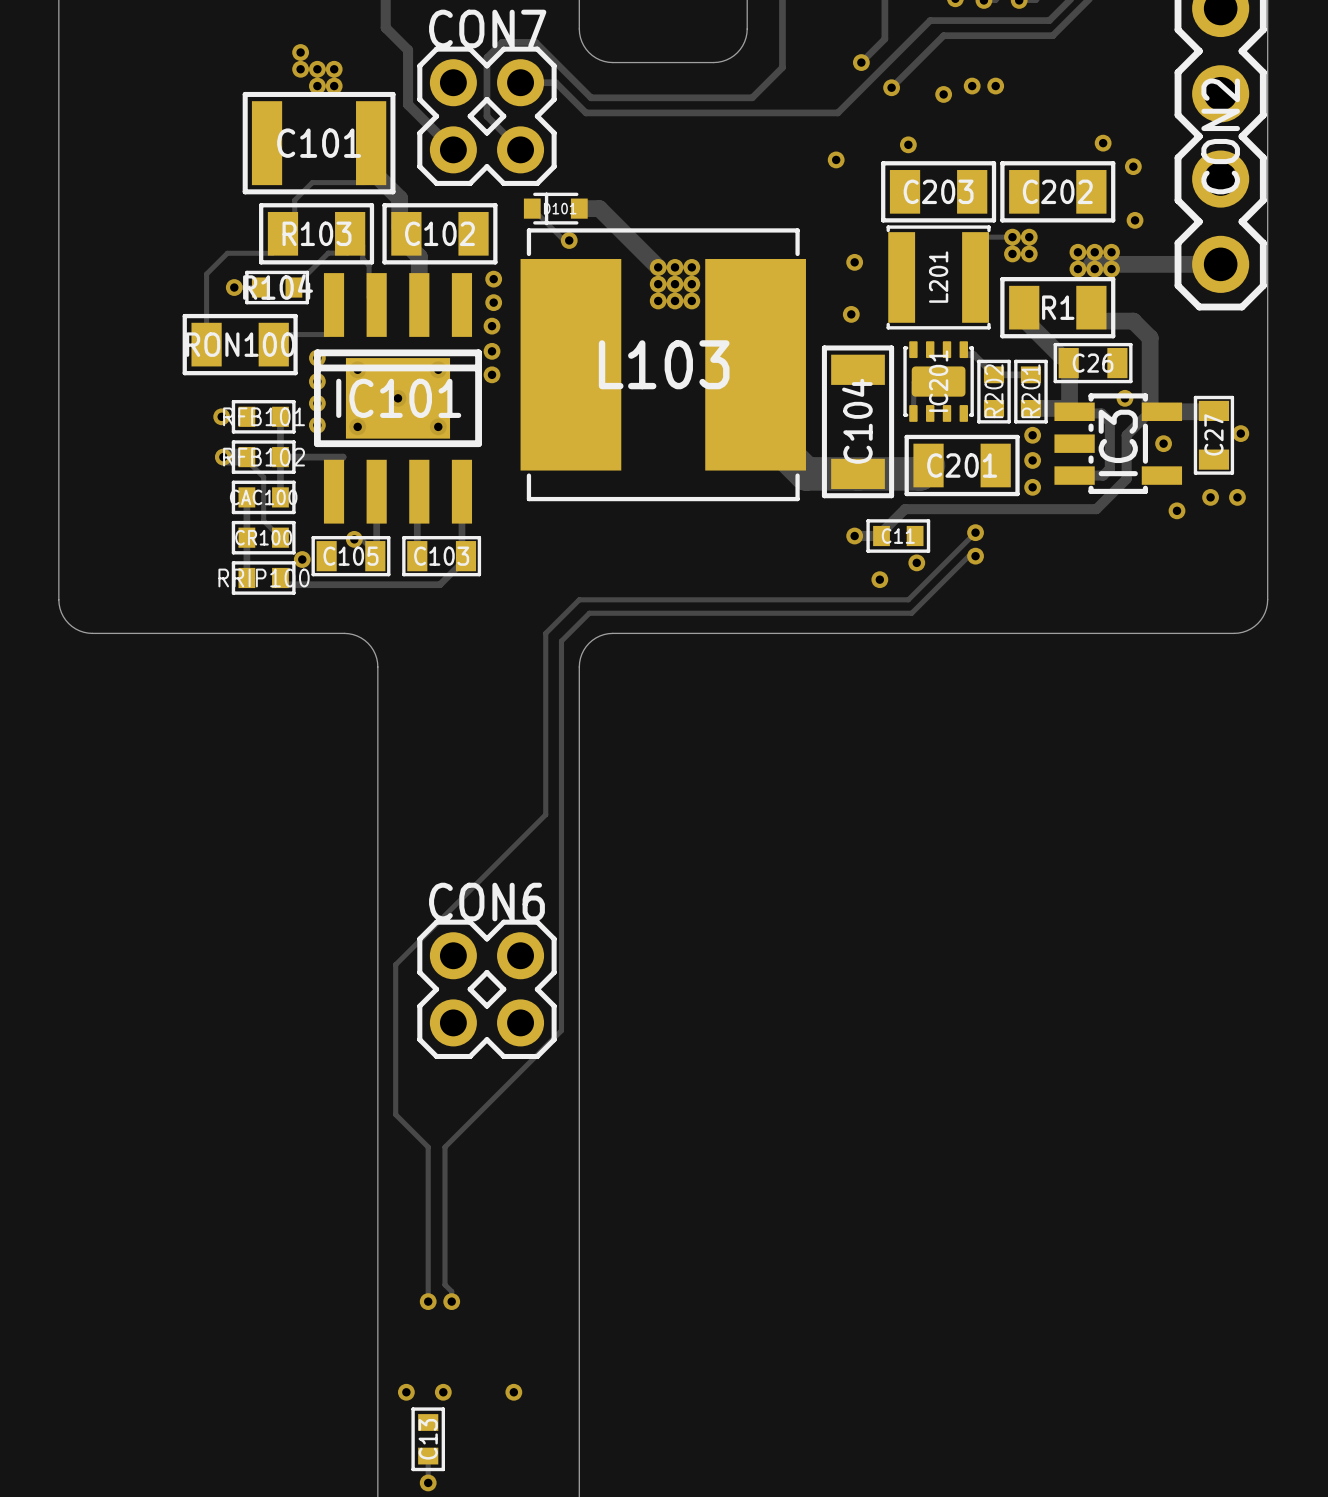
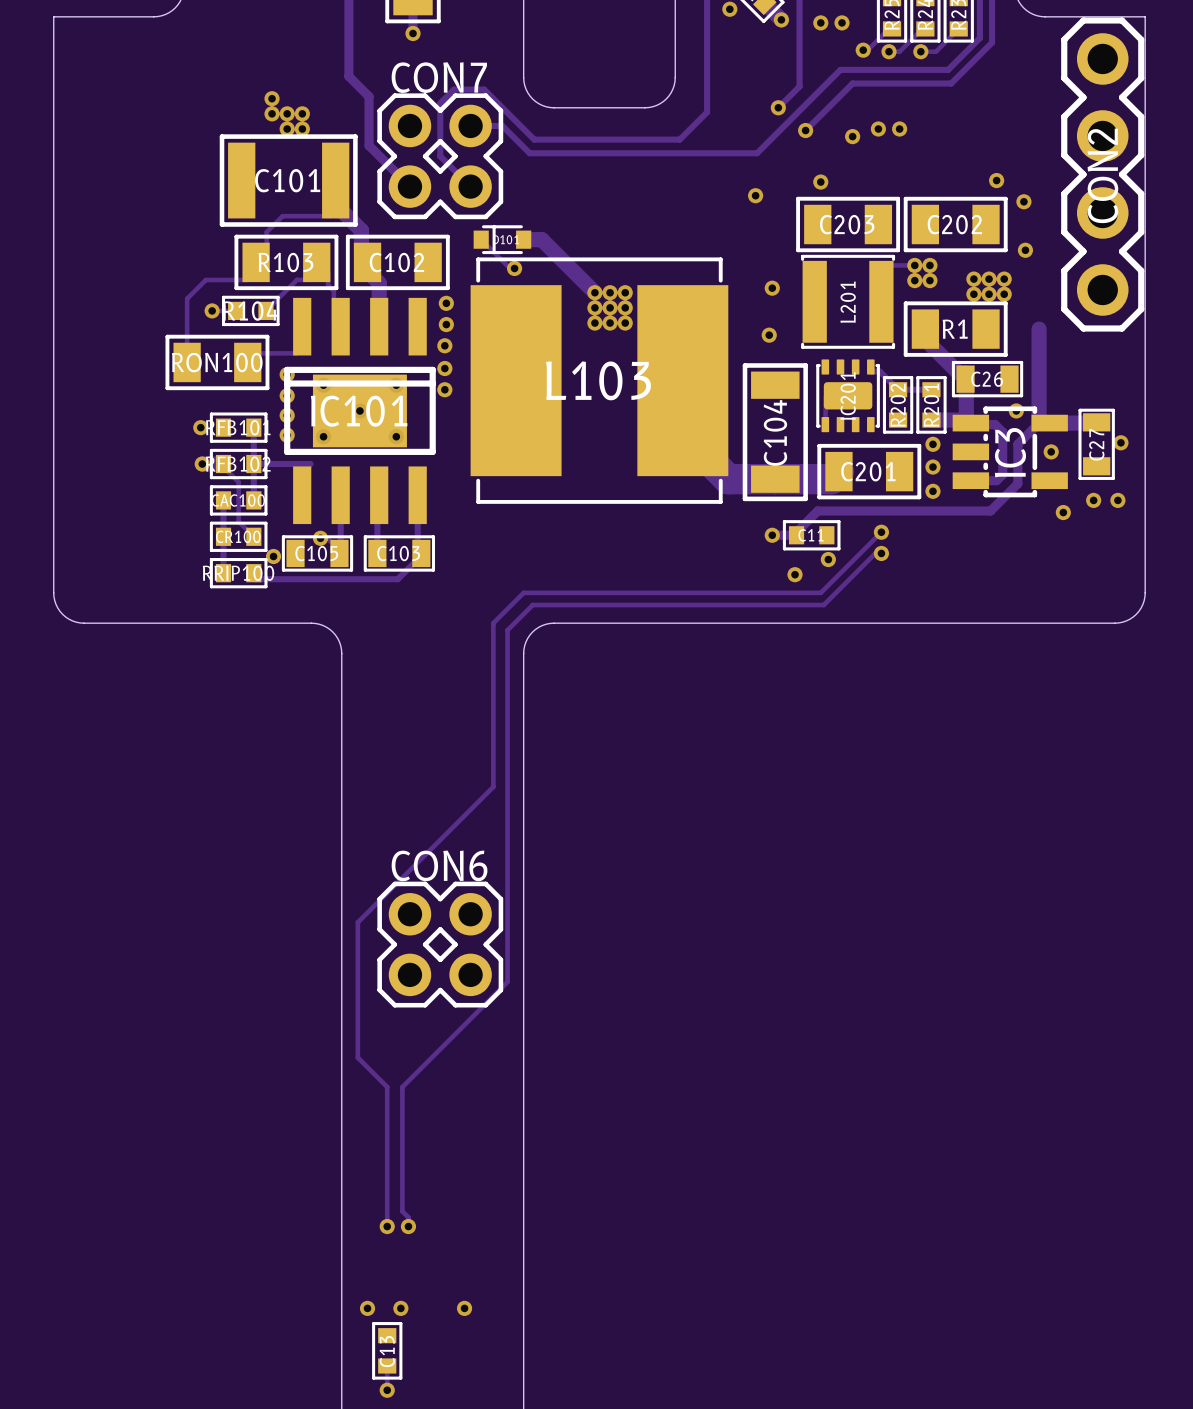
track: (1091, 264) (1220, 264) -> none
track: (1108, 321) (1133, 321) (1150, 337) -> (1039, 329) (1039, 356)

